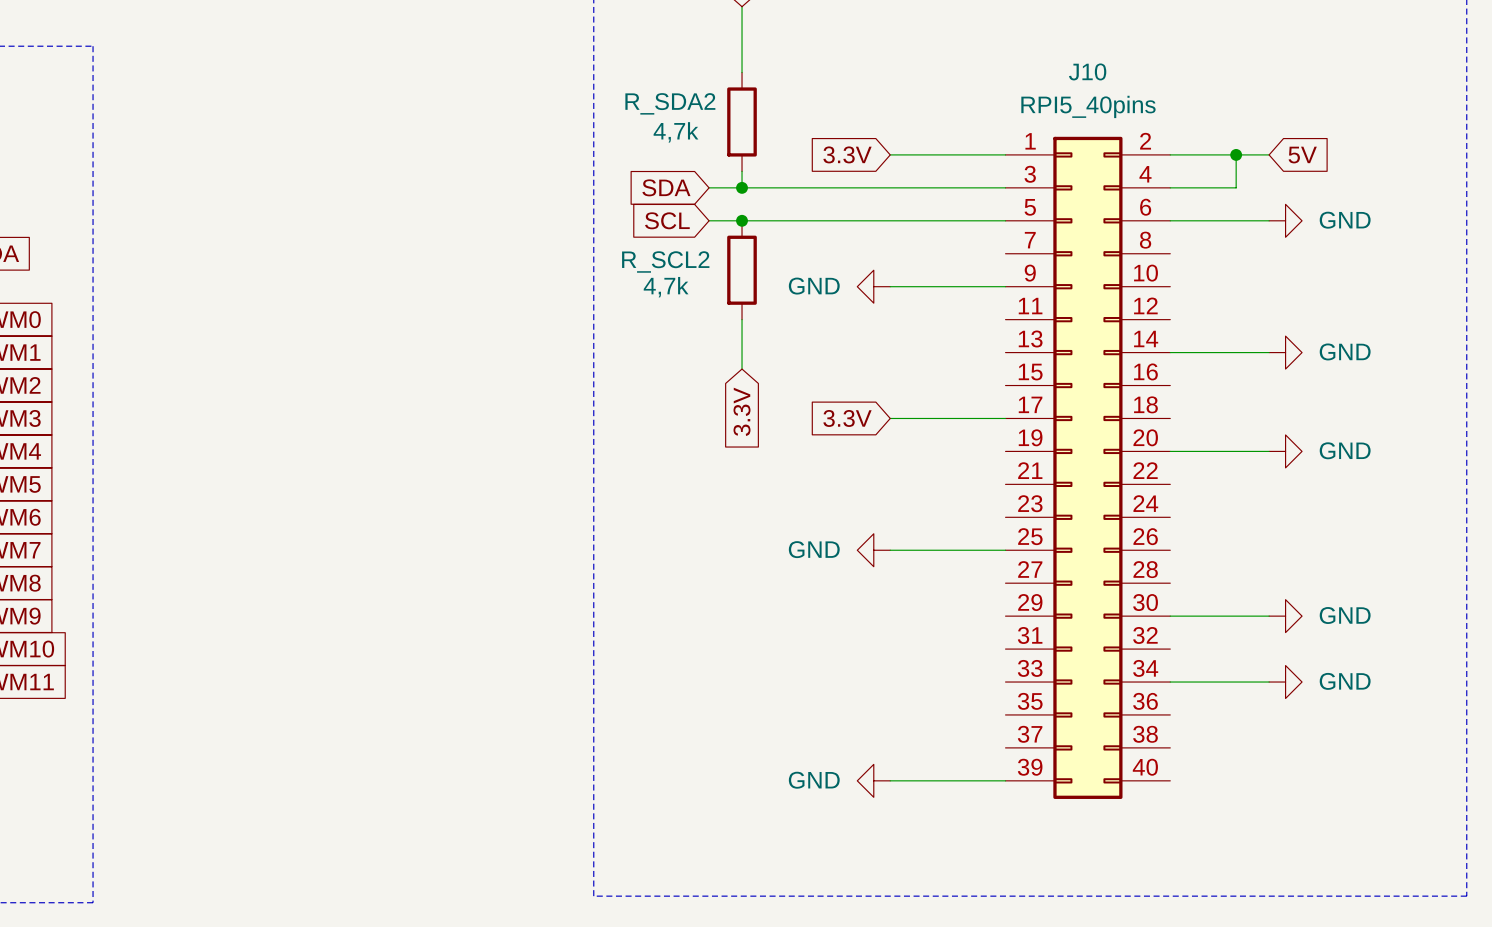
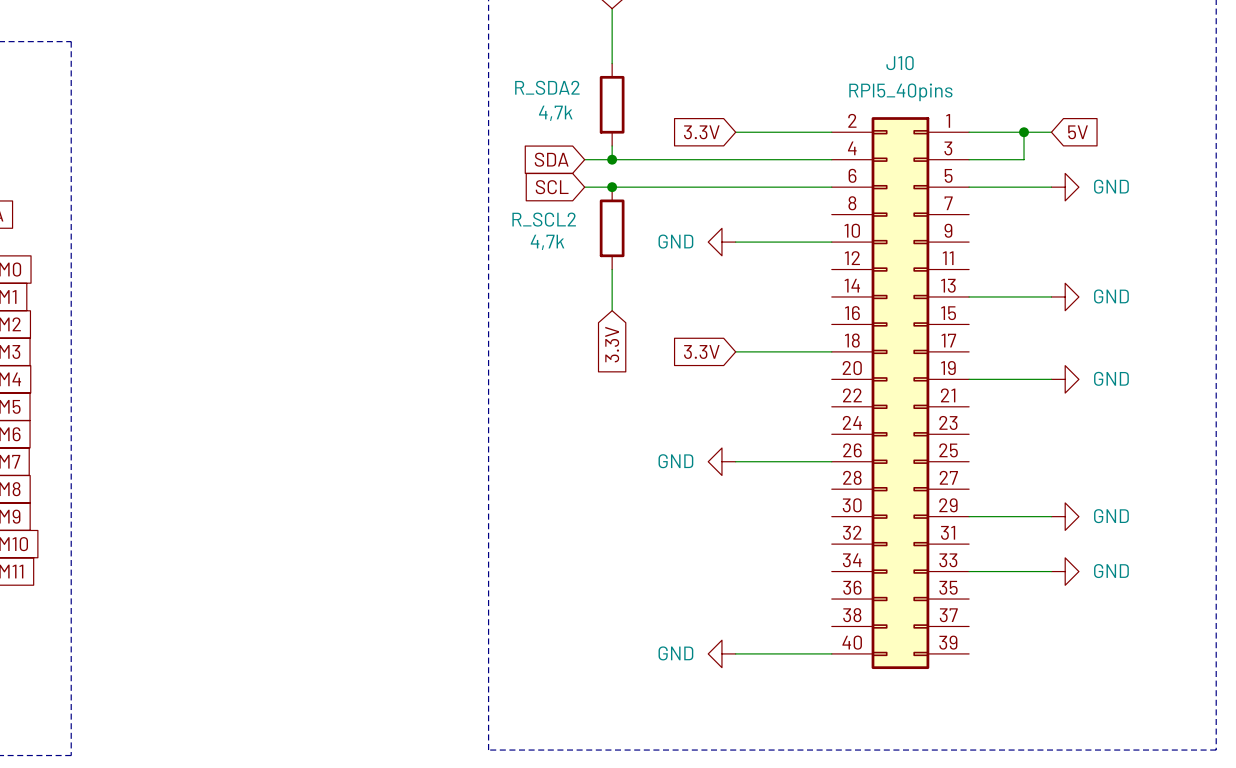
J10 flip: as is (1087, 467) -> left-right (900, 393)

